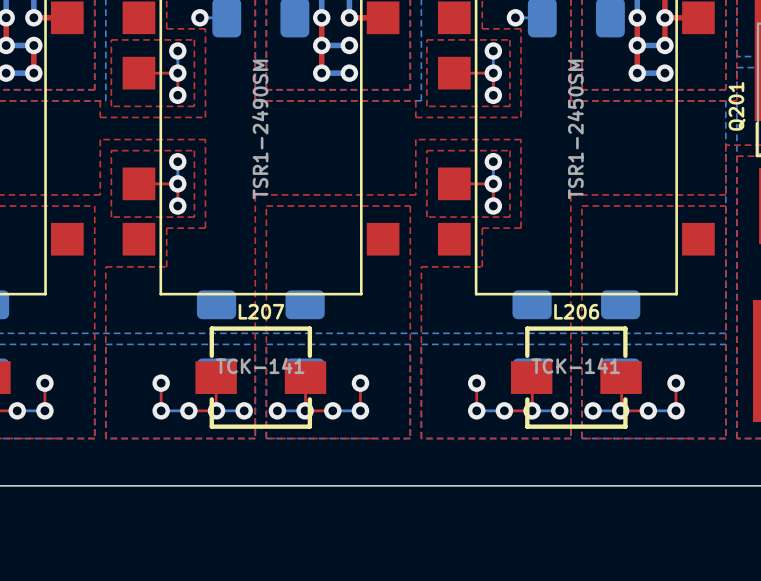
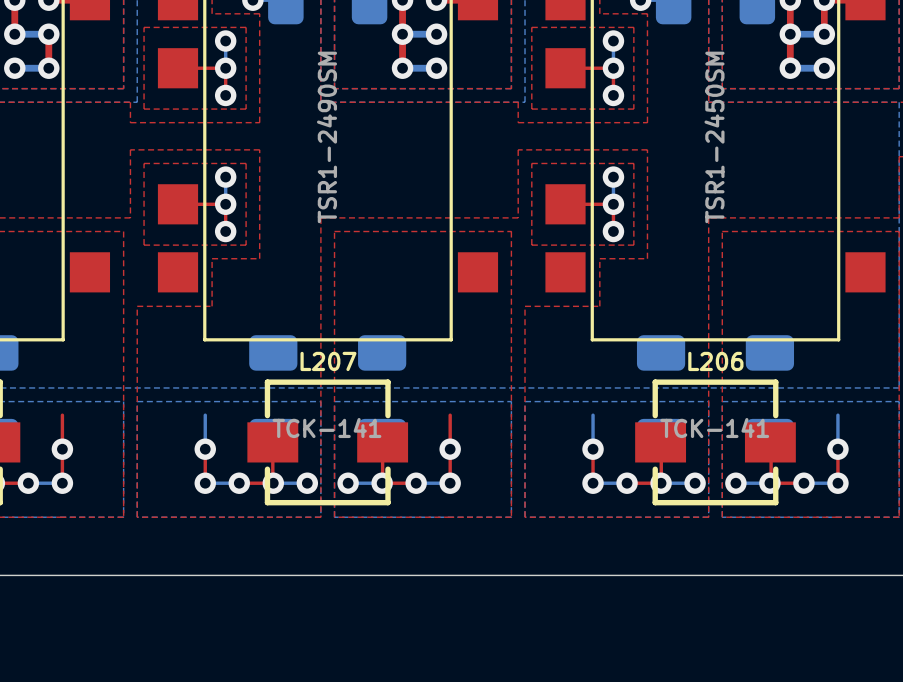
top track: none -> (62, 415) (62, 449)
bottom track: none -> (205, 415) (205, 449)
top track: none -> (450, 415) (450, 449)
bottom track: none -> (593, 415) (593, 449)
bottom track: none -> (837, 415) (837, 449)

